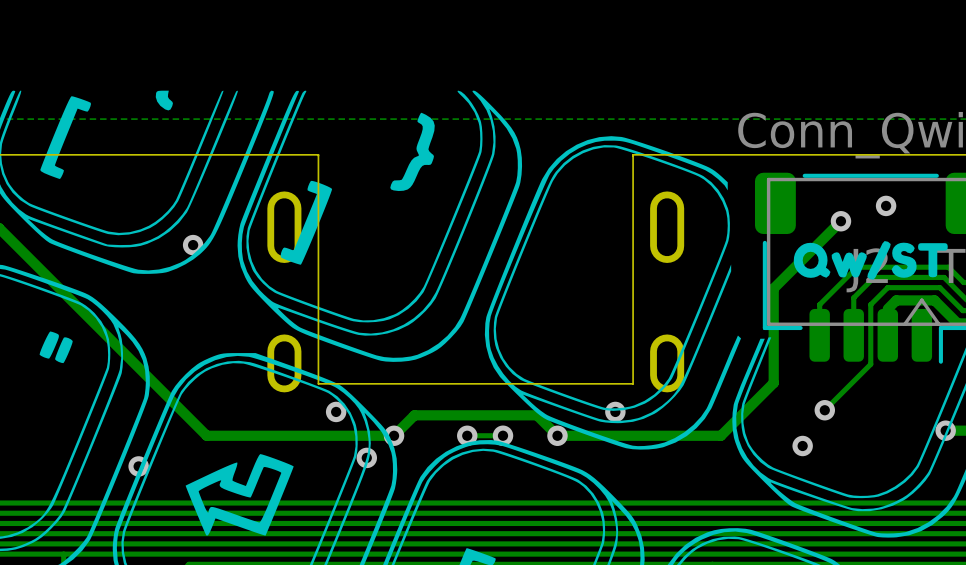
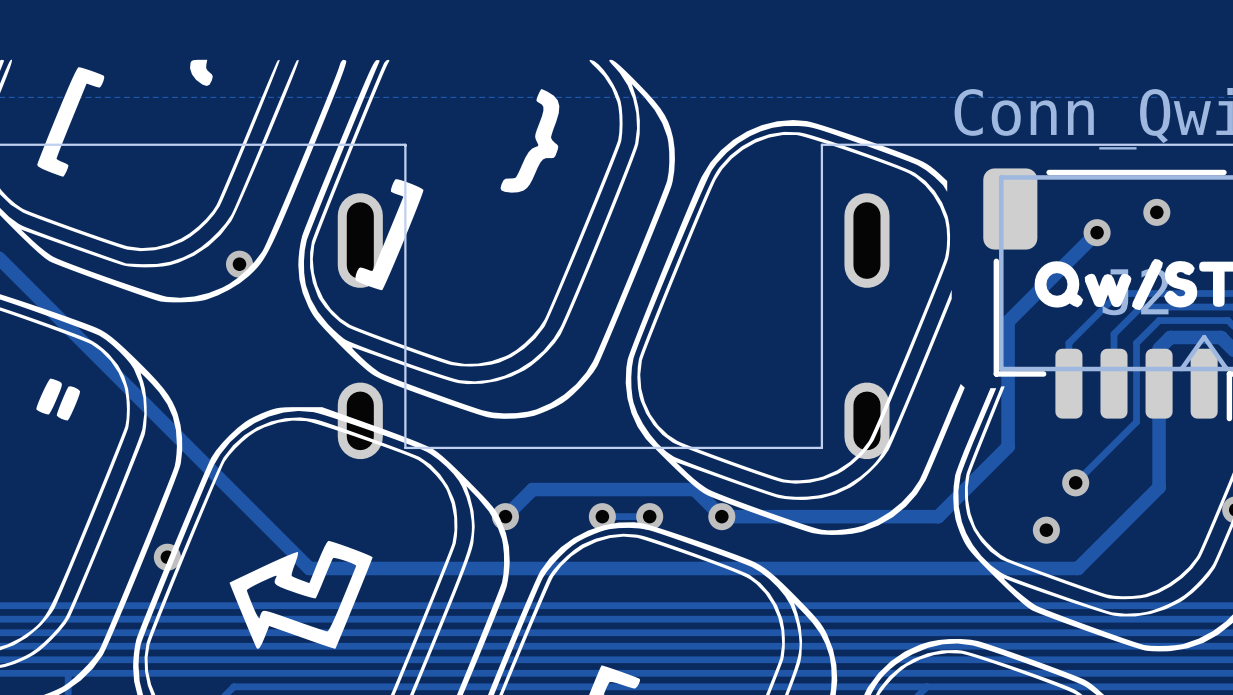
via: (336, 411) -> none
via: (615, 411) -> none
track: (394, 435) (206, 435) -> (1159, 383) (1159, 487) (1077, 568) (309, 568) (257, 516)
via: (366, 457) -> none

